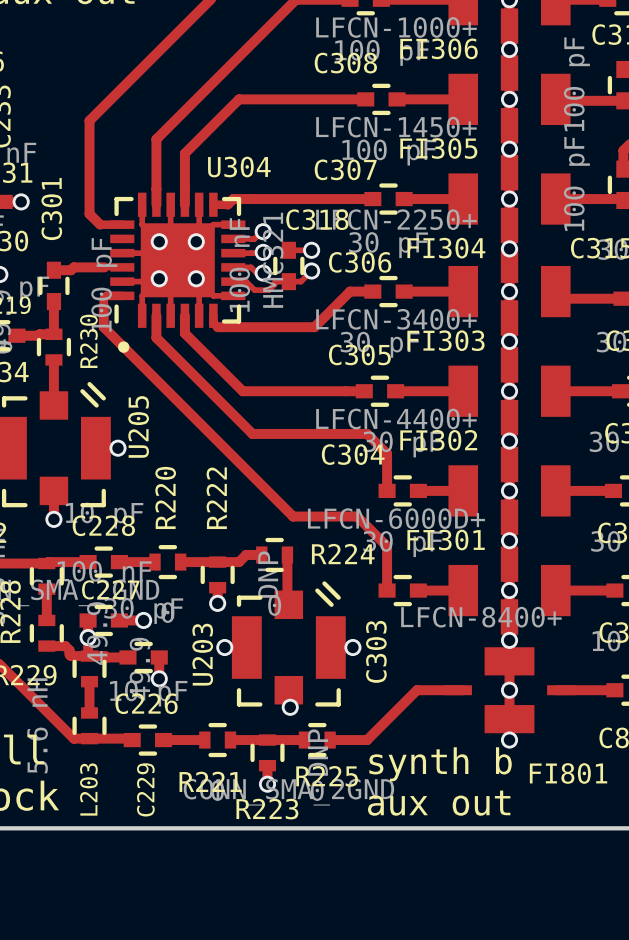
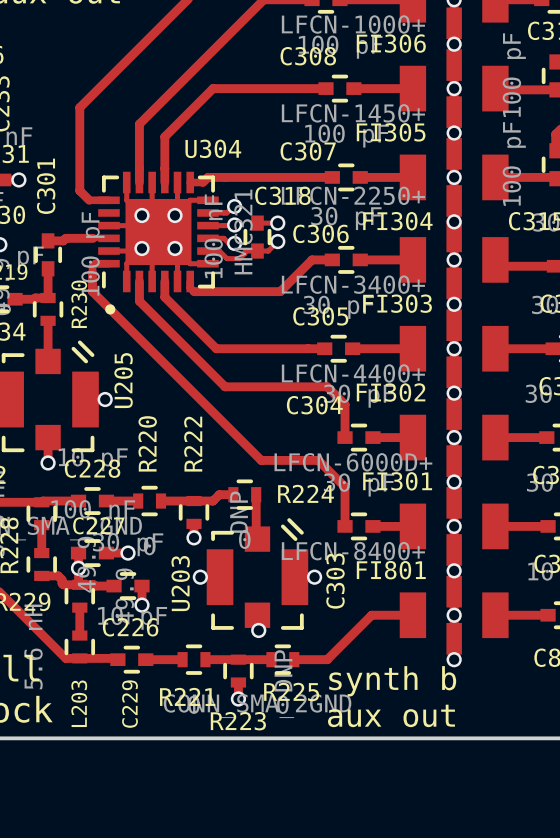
FI801 value position: LFCN-8400+ (481, 617) -> LFCN-8400+ (353, 551)
FI801 footprint: [443, 647, 576, 734] -> [399, 575, 509, 655]
FI801 name position: FI801 (568, 773) -> FI801 (391, 570)

